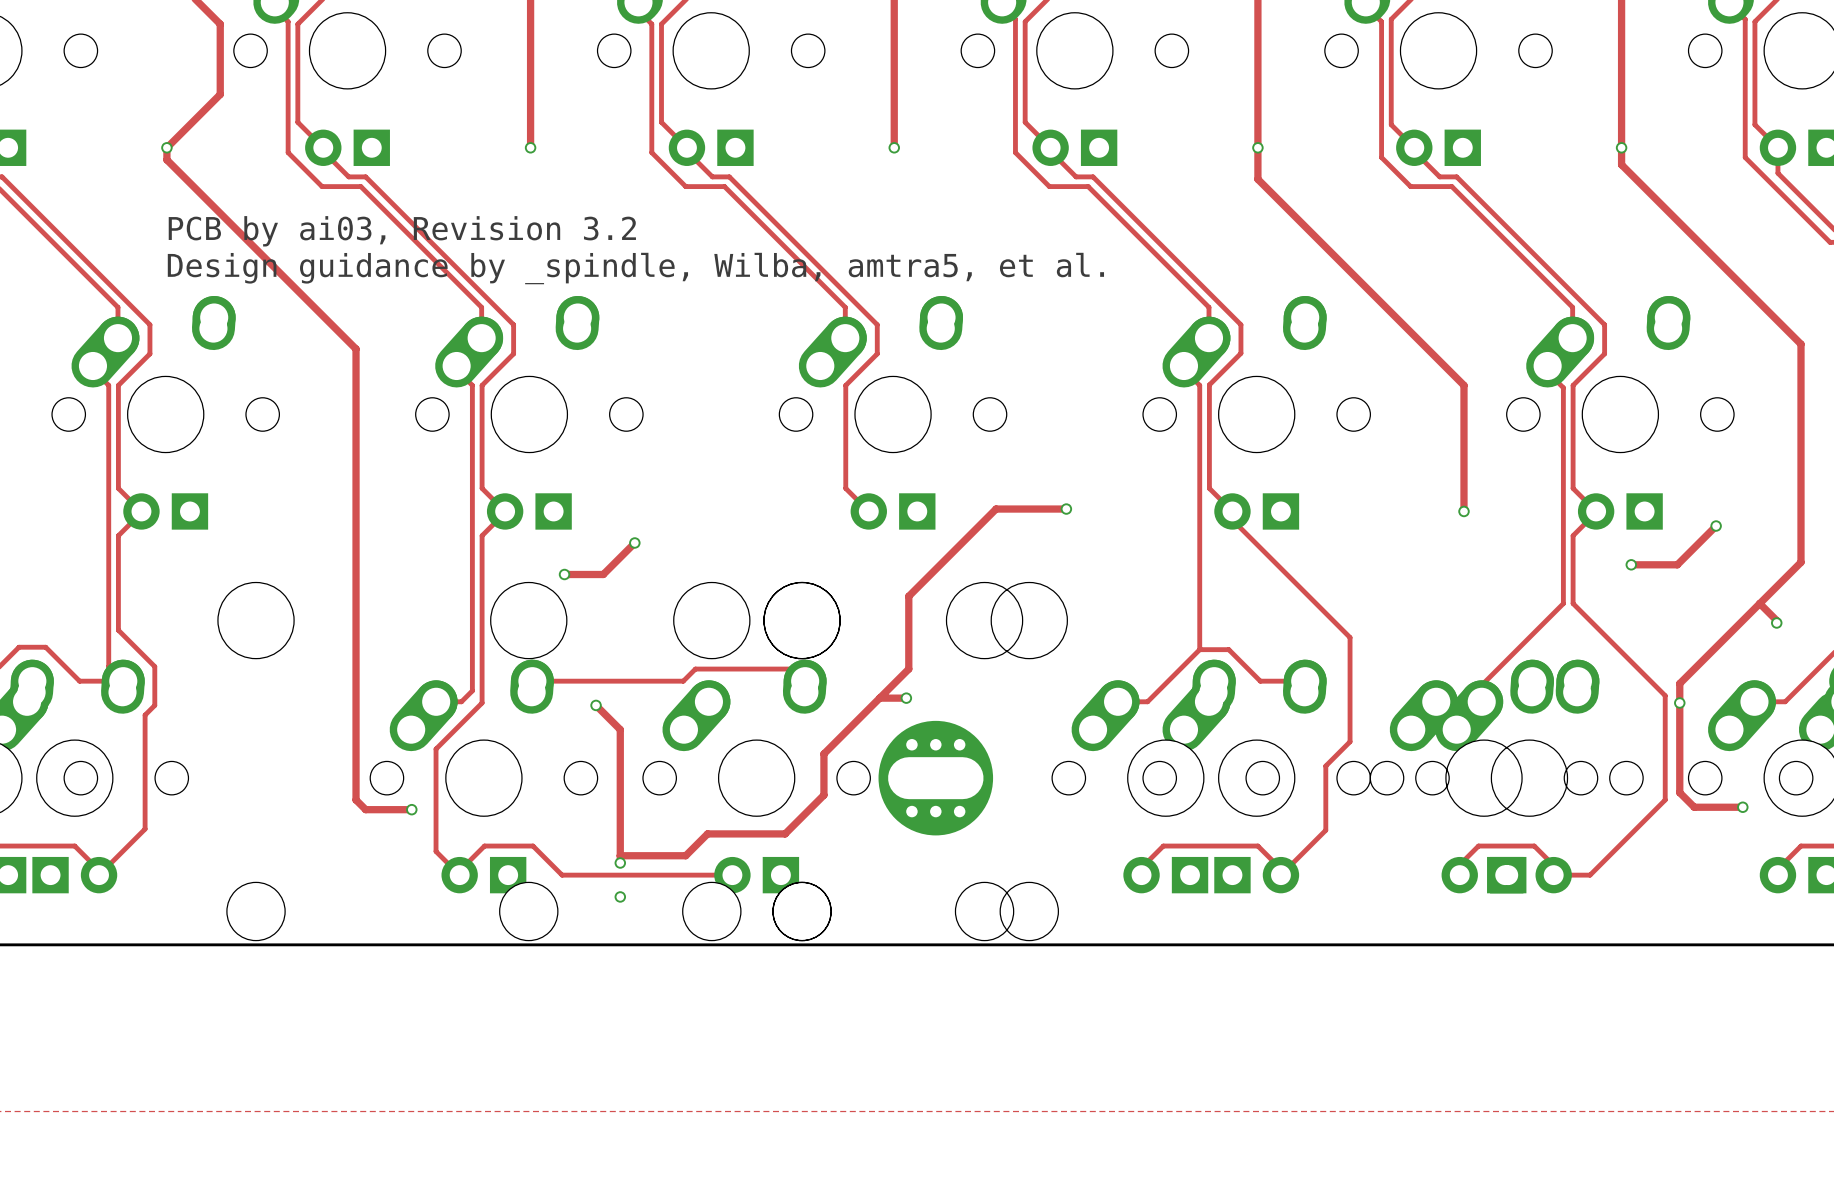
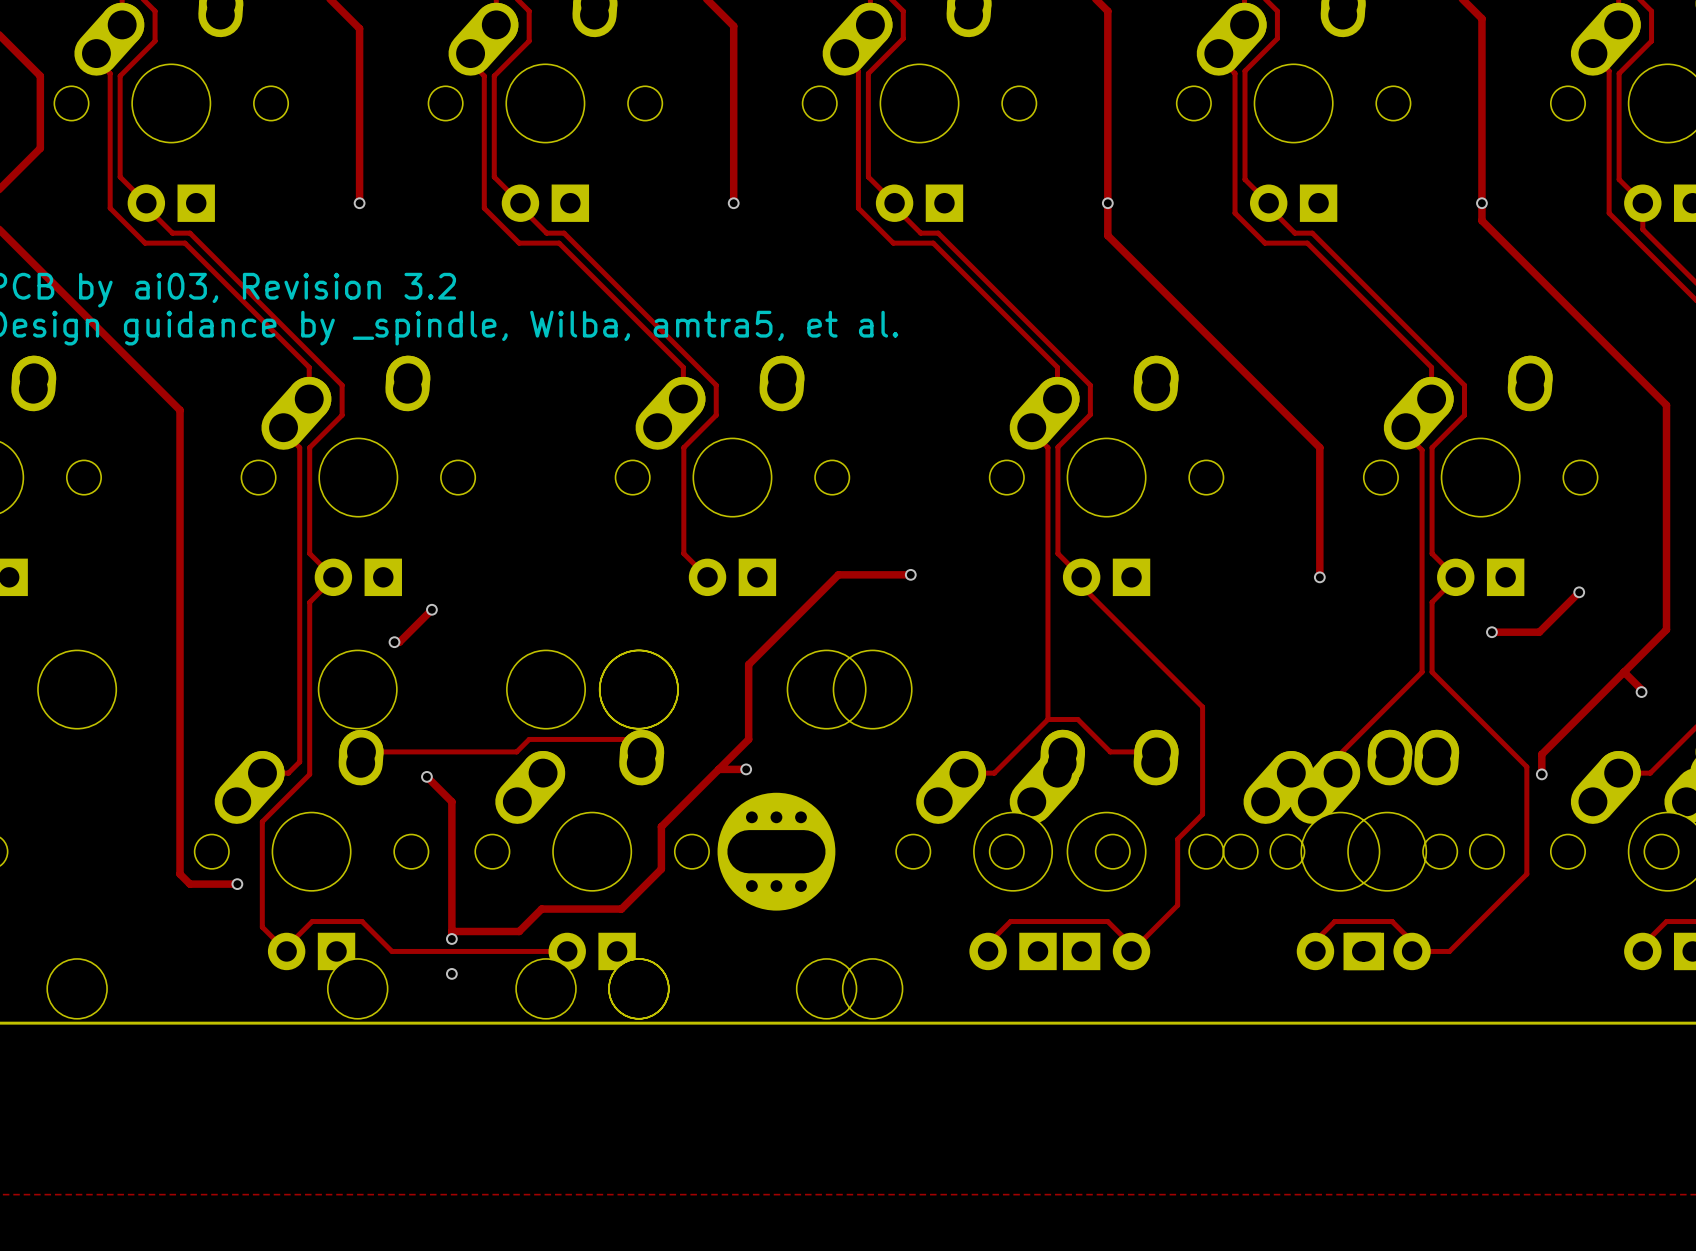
track: (634, 542) (603, 574) (569, 574) -> (431, 609) (399, 642)
via position: (634, 542) -> (431, 609)
track: (1679, 702) (1679, 792) (1694, 807) (1742, 807) -> none
via: (1742, 807) -> none

